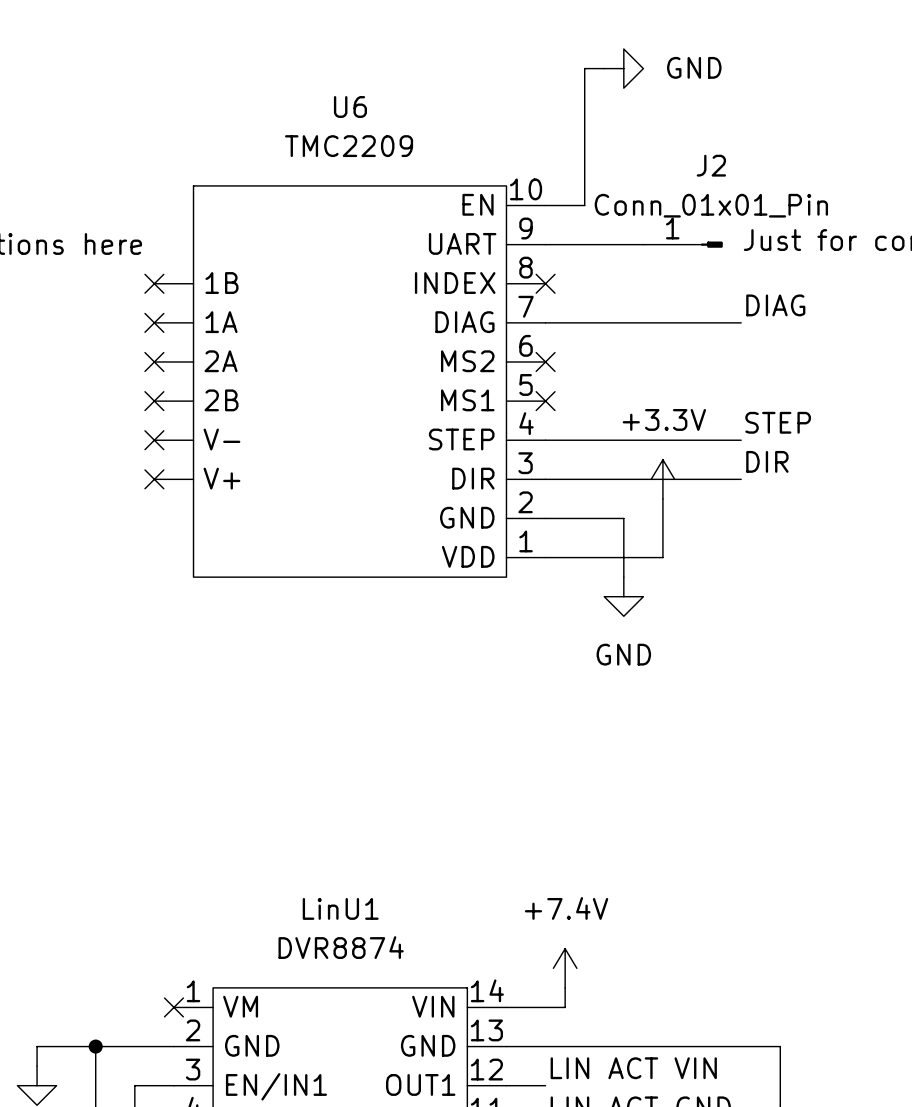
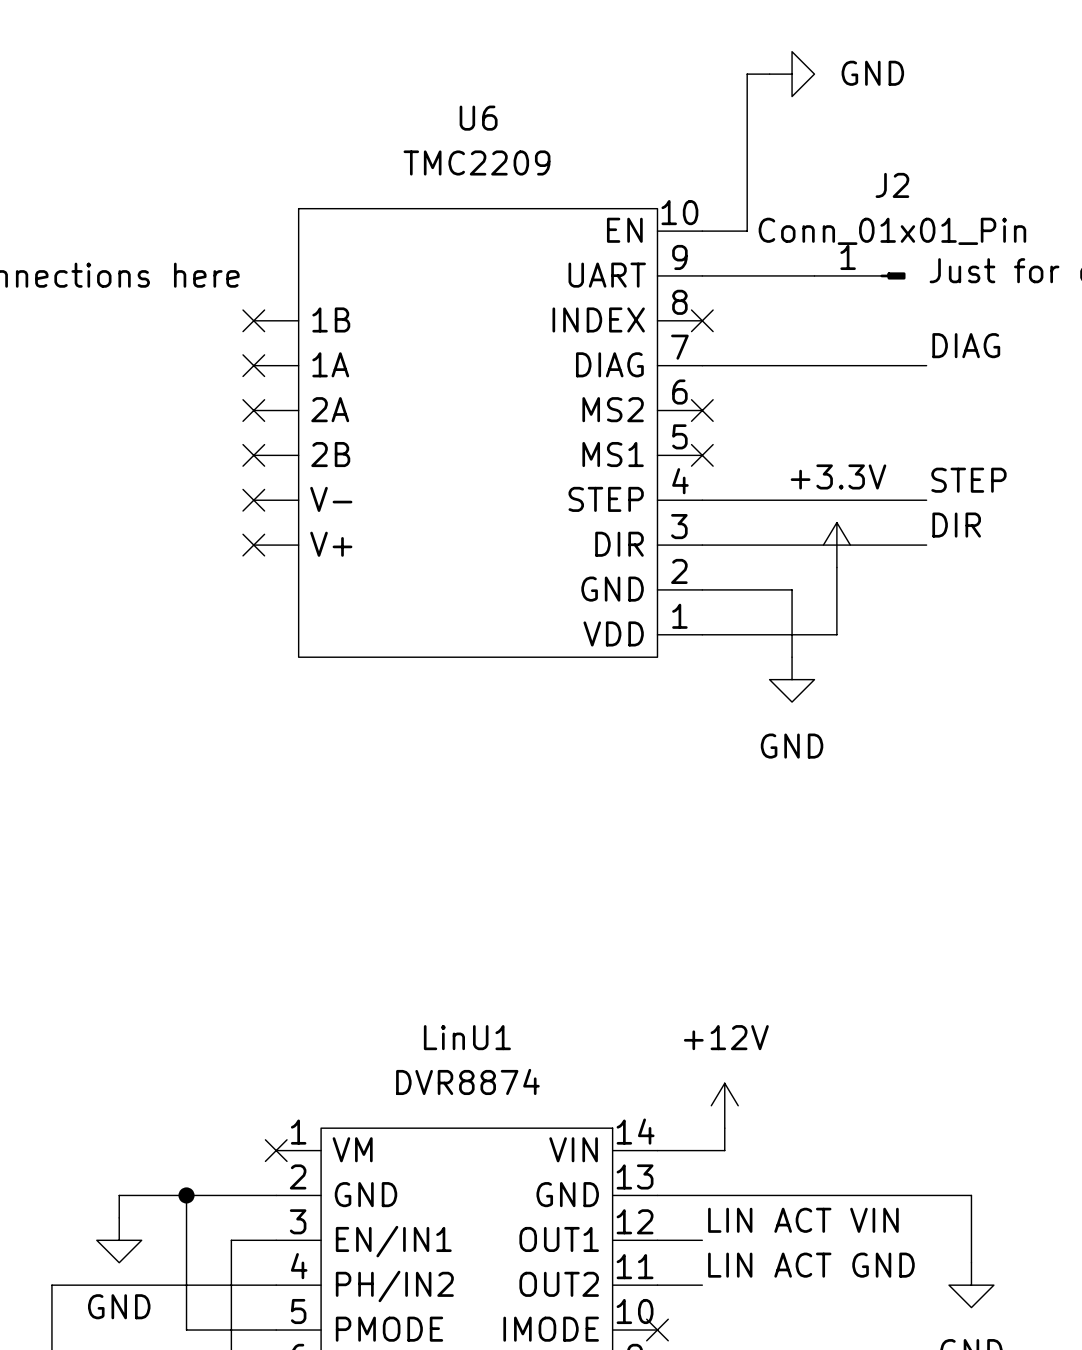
power symbol: +7.4V (565, 968) -> +12V (724, 1105)

